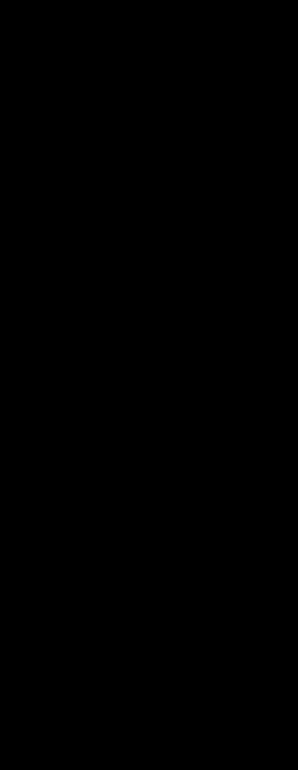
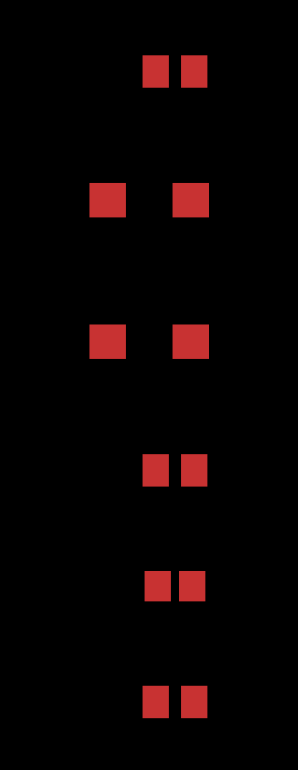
part: none -> (174, 71)
part: none -> (149, 200)
part: none -> (149, 341)
part: none -> (174, 470)
part: none -> (174, 586)
part: none -> (174, 701)

